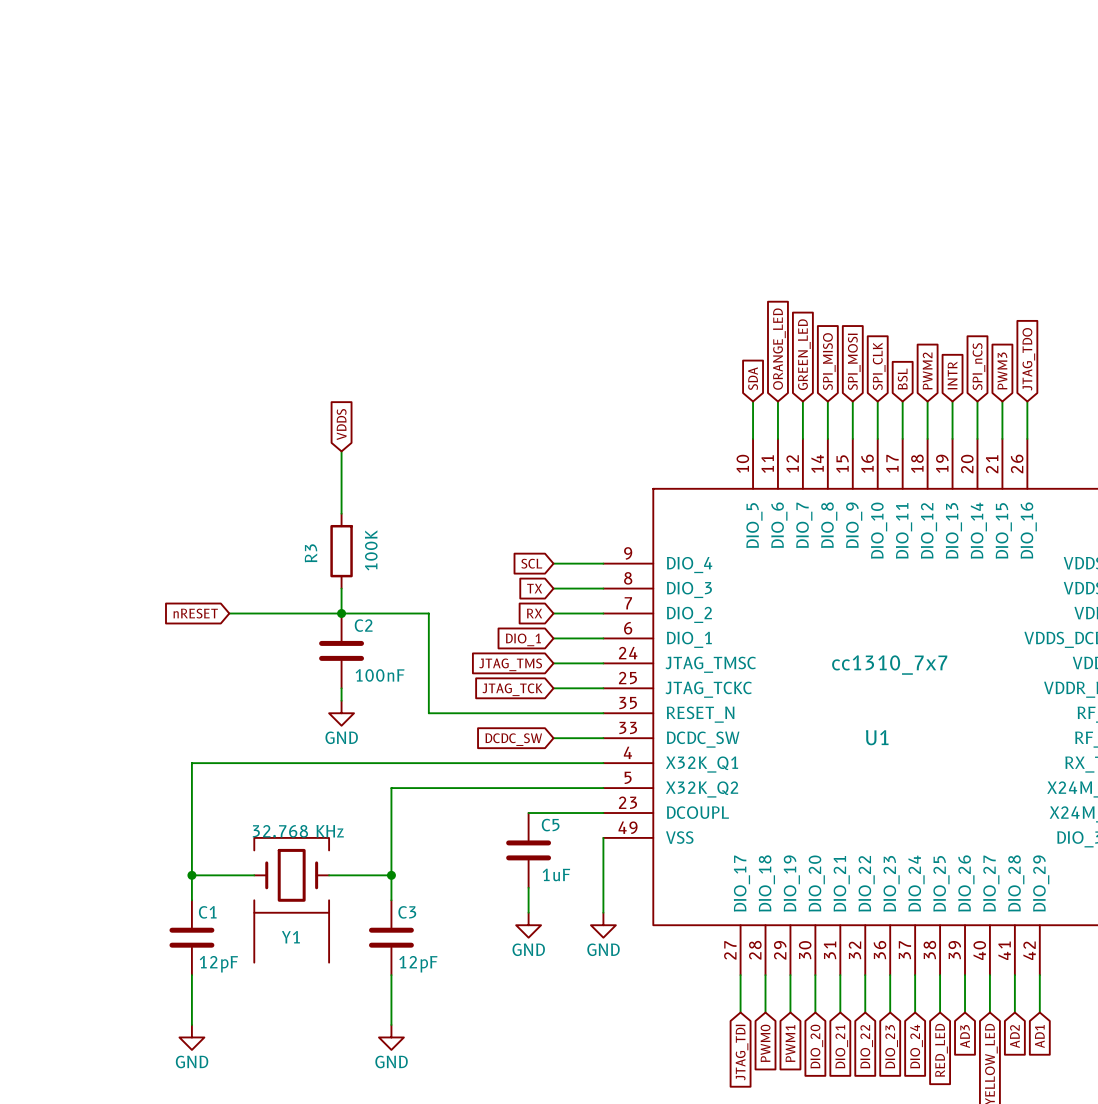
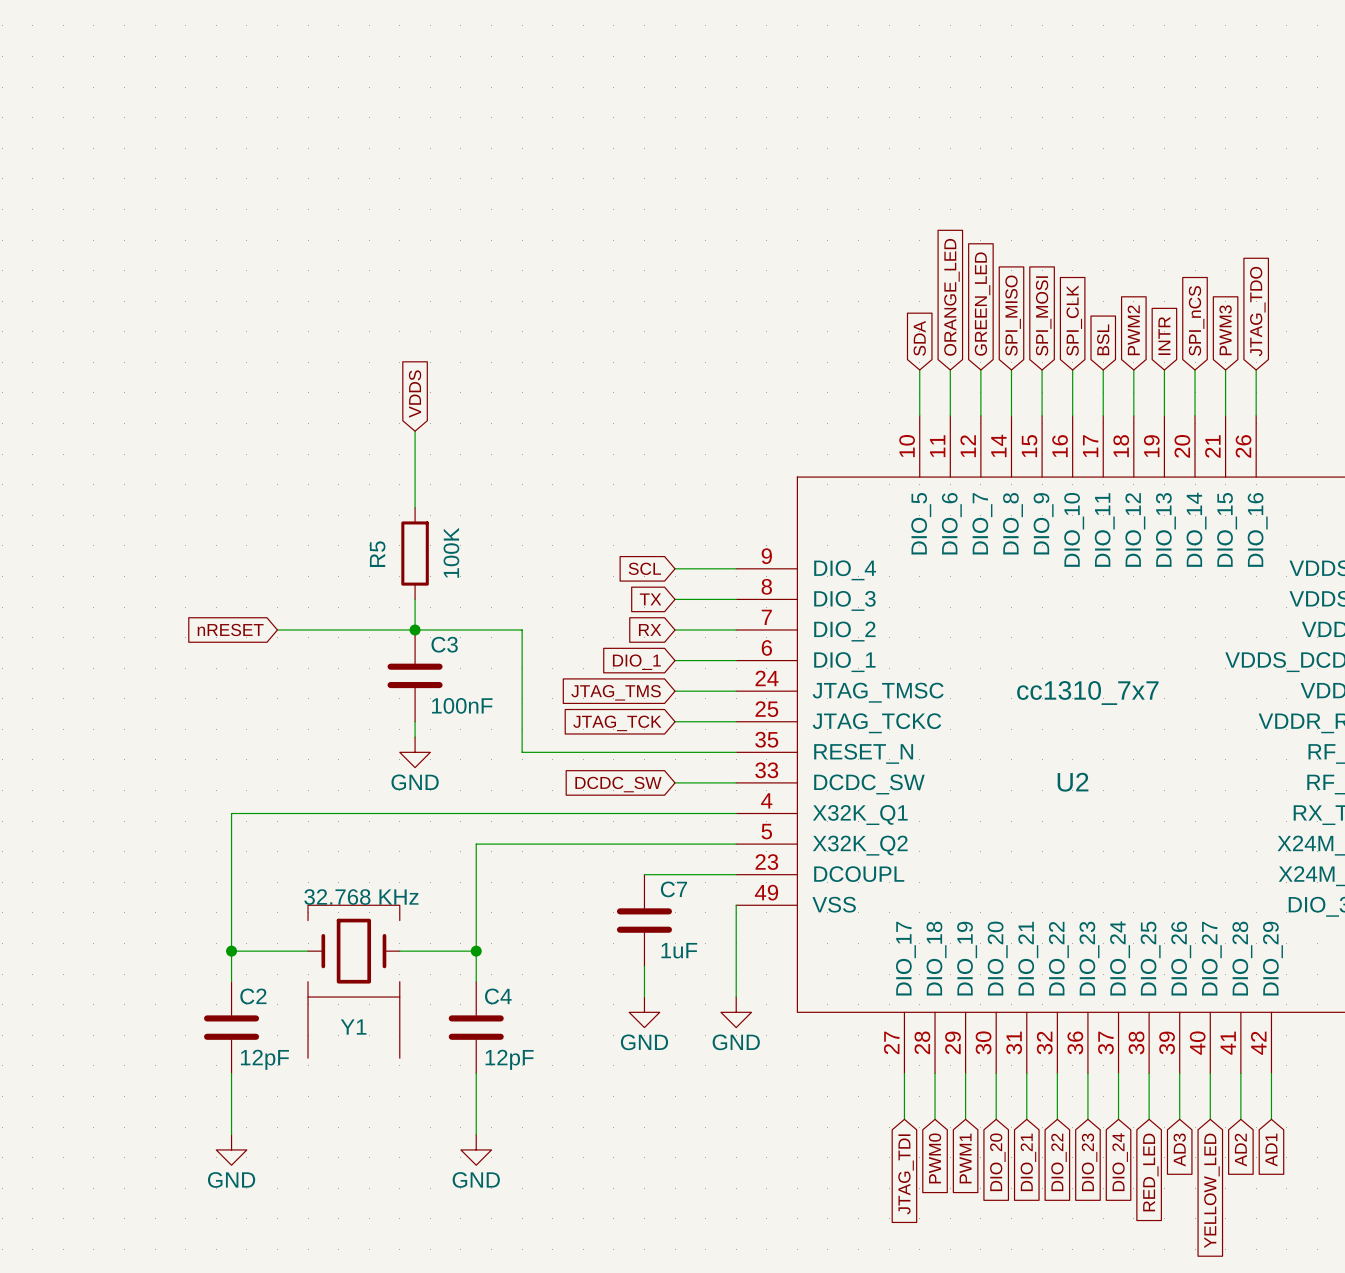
R3 name: R3 (311, 553) -> R5 (377, 554)
C2 name: C2 (363, 625) -> C3 (444, 644)
U1 name: U1 (877, 737) -> U2 (1073, 782)
C5 name: C5 (550, 825) -> C7 (673, 889)
C1 name: C1 (207, 912) -> C2 (253, 996)
C3 name: C3 (407, 912) -> C4 (498, 996)

